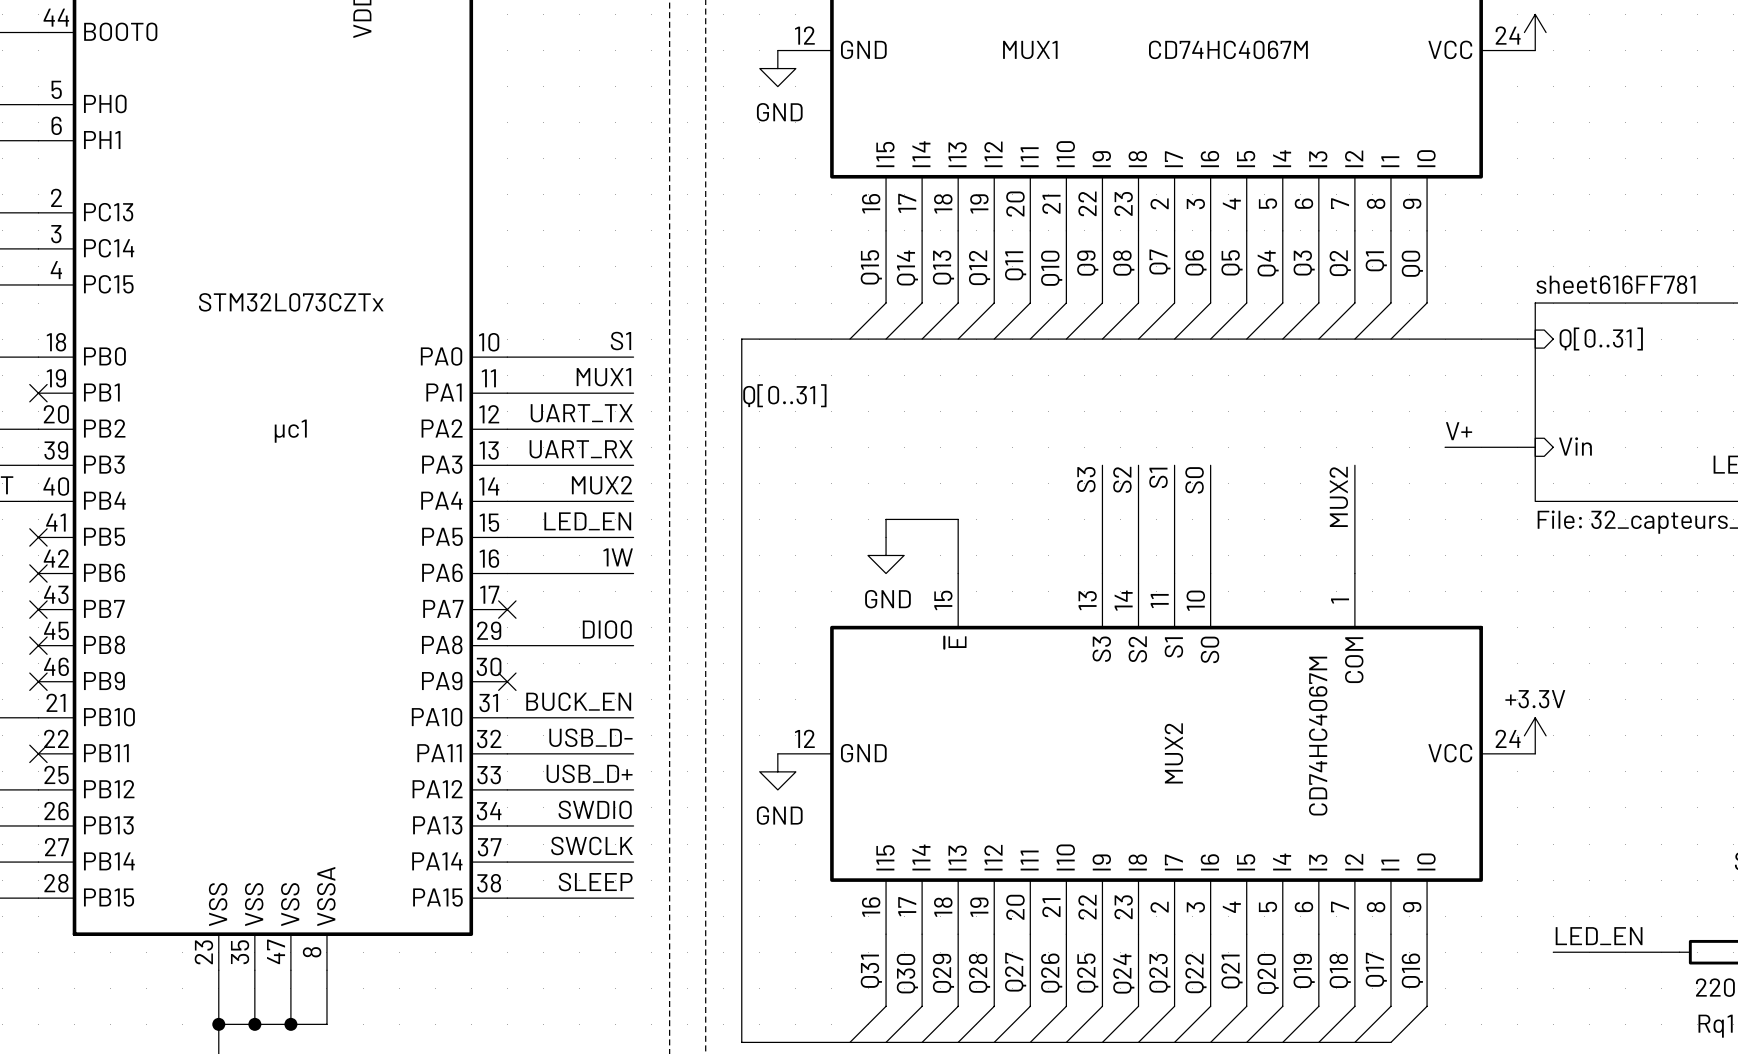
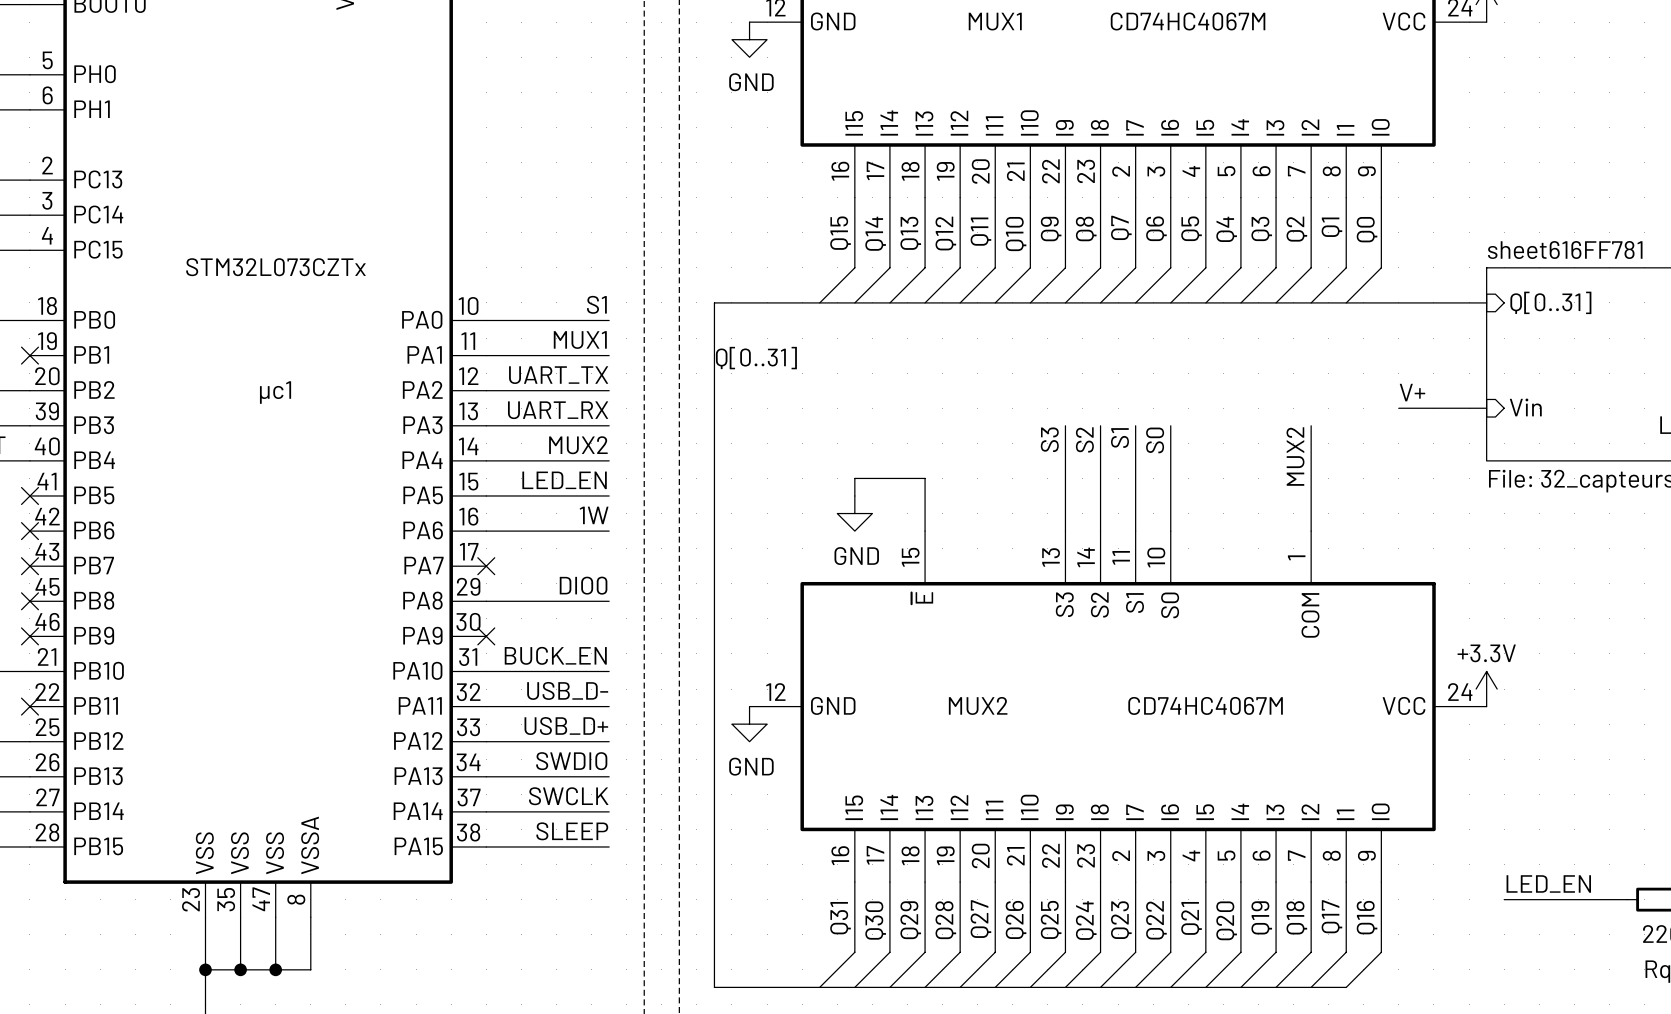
MUX2 value rotation: 0° (1318, 736) -> 90° clockwise (1205, 705)
MUX2 name rotation: 0° (1173, 753) -> 90° clockwise (978, 705)
MUX2 name position: MUX2 (1173, 753) -> MUX2 (978, 705)

